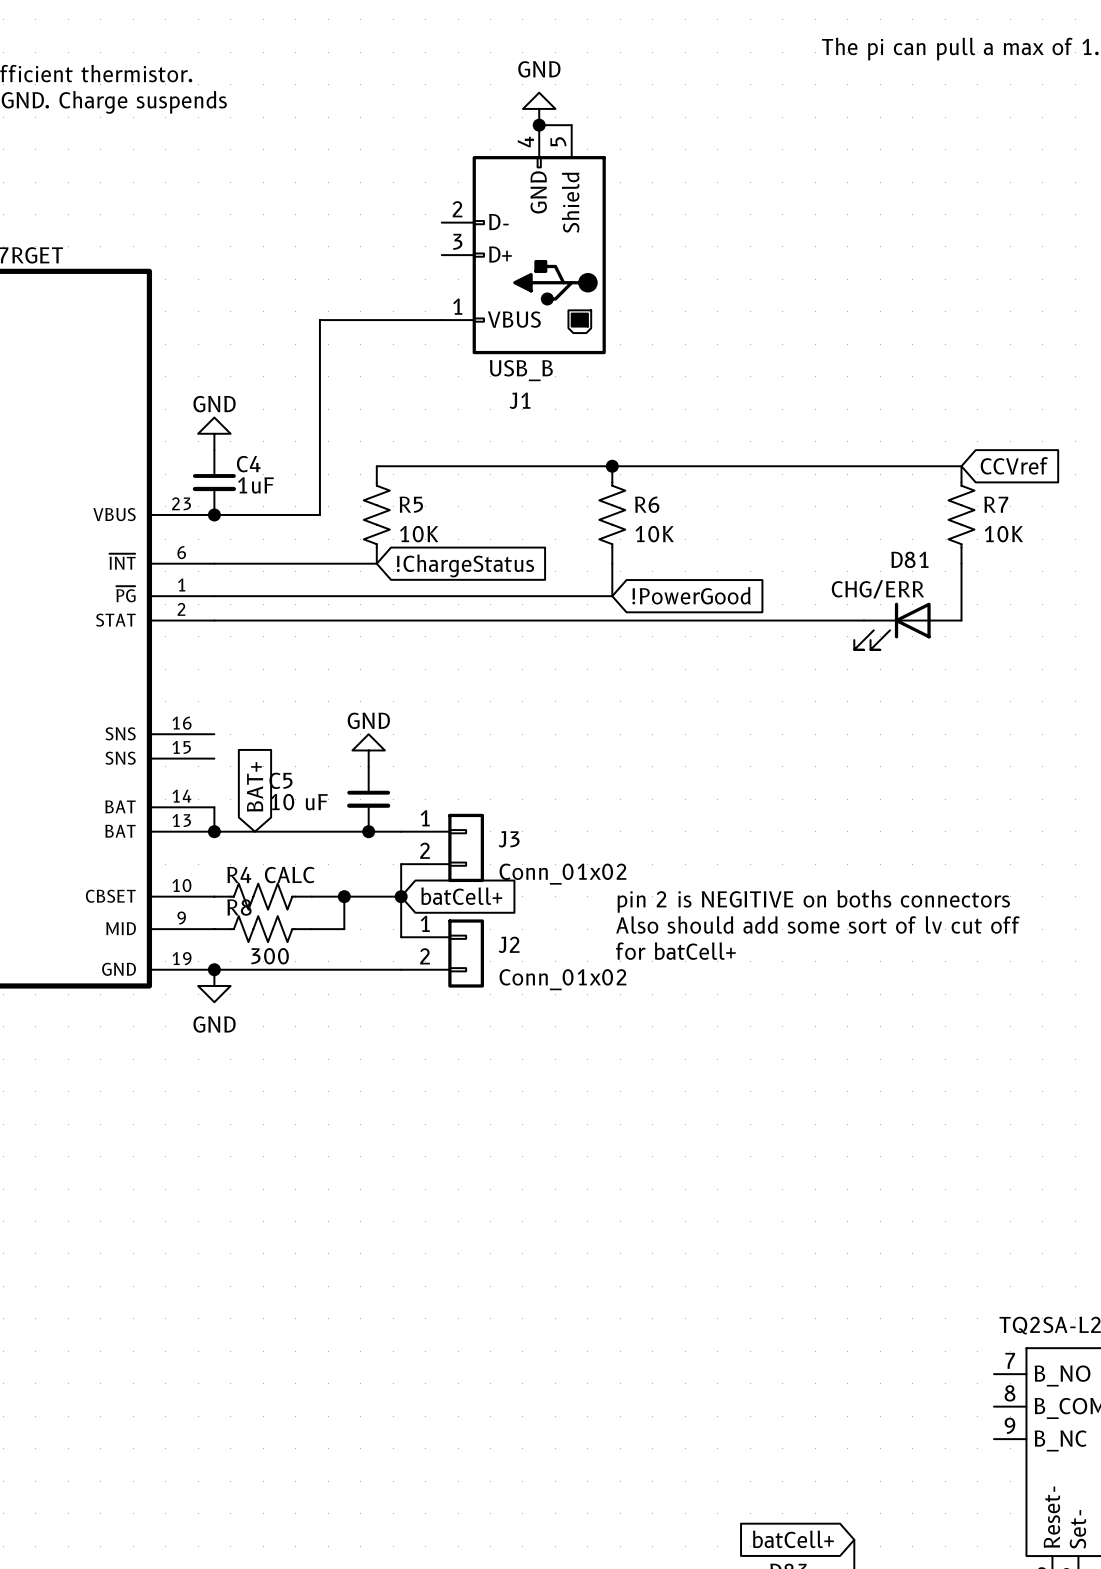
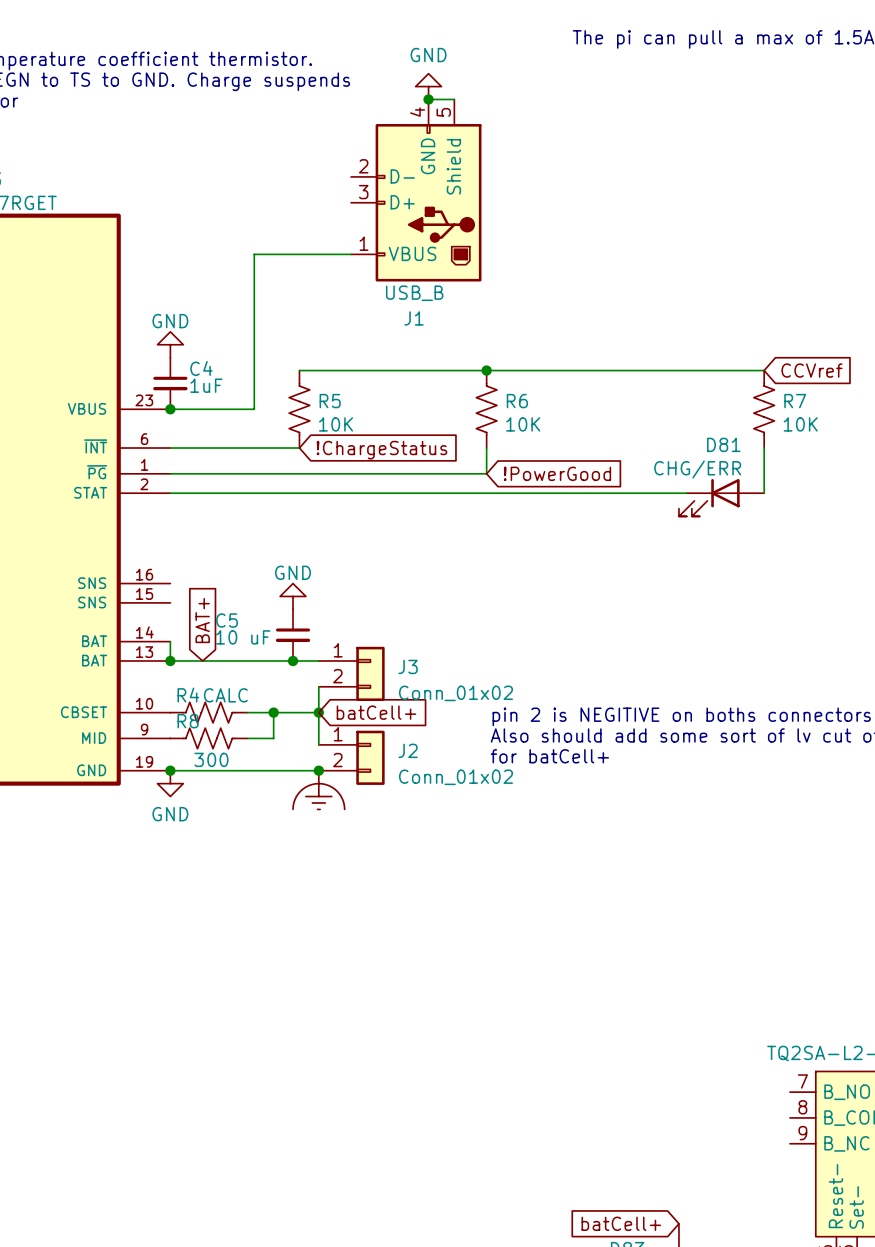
junction: none -> (318, 770)
power symbol: none -> (318, 790)

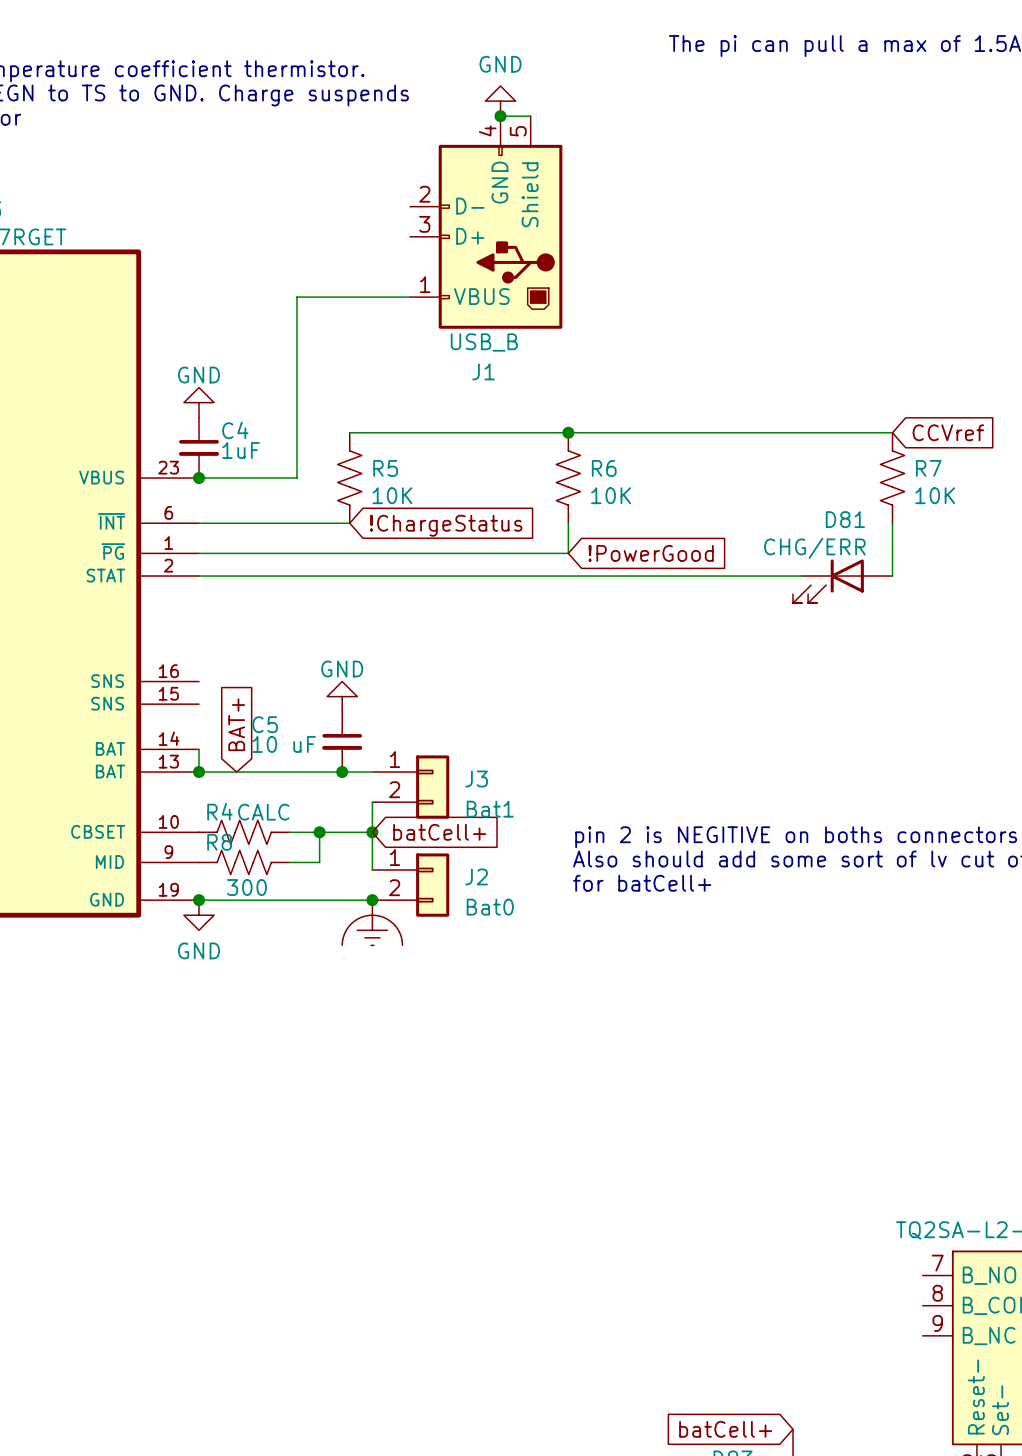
J3 value: Conn_01x02 (456, 693) -> Bat1 (490, 809)
J2 value: Conn_01x02 (456, 777) -> Bat0 (490, 907)

